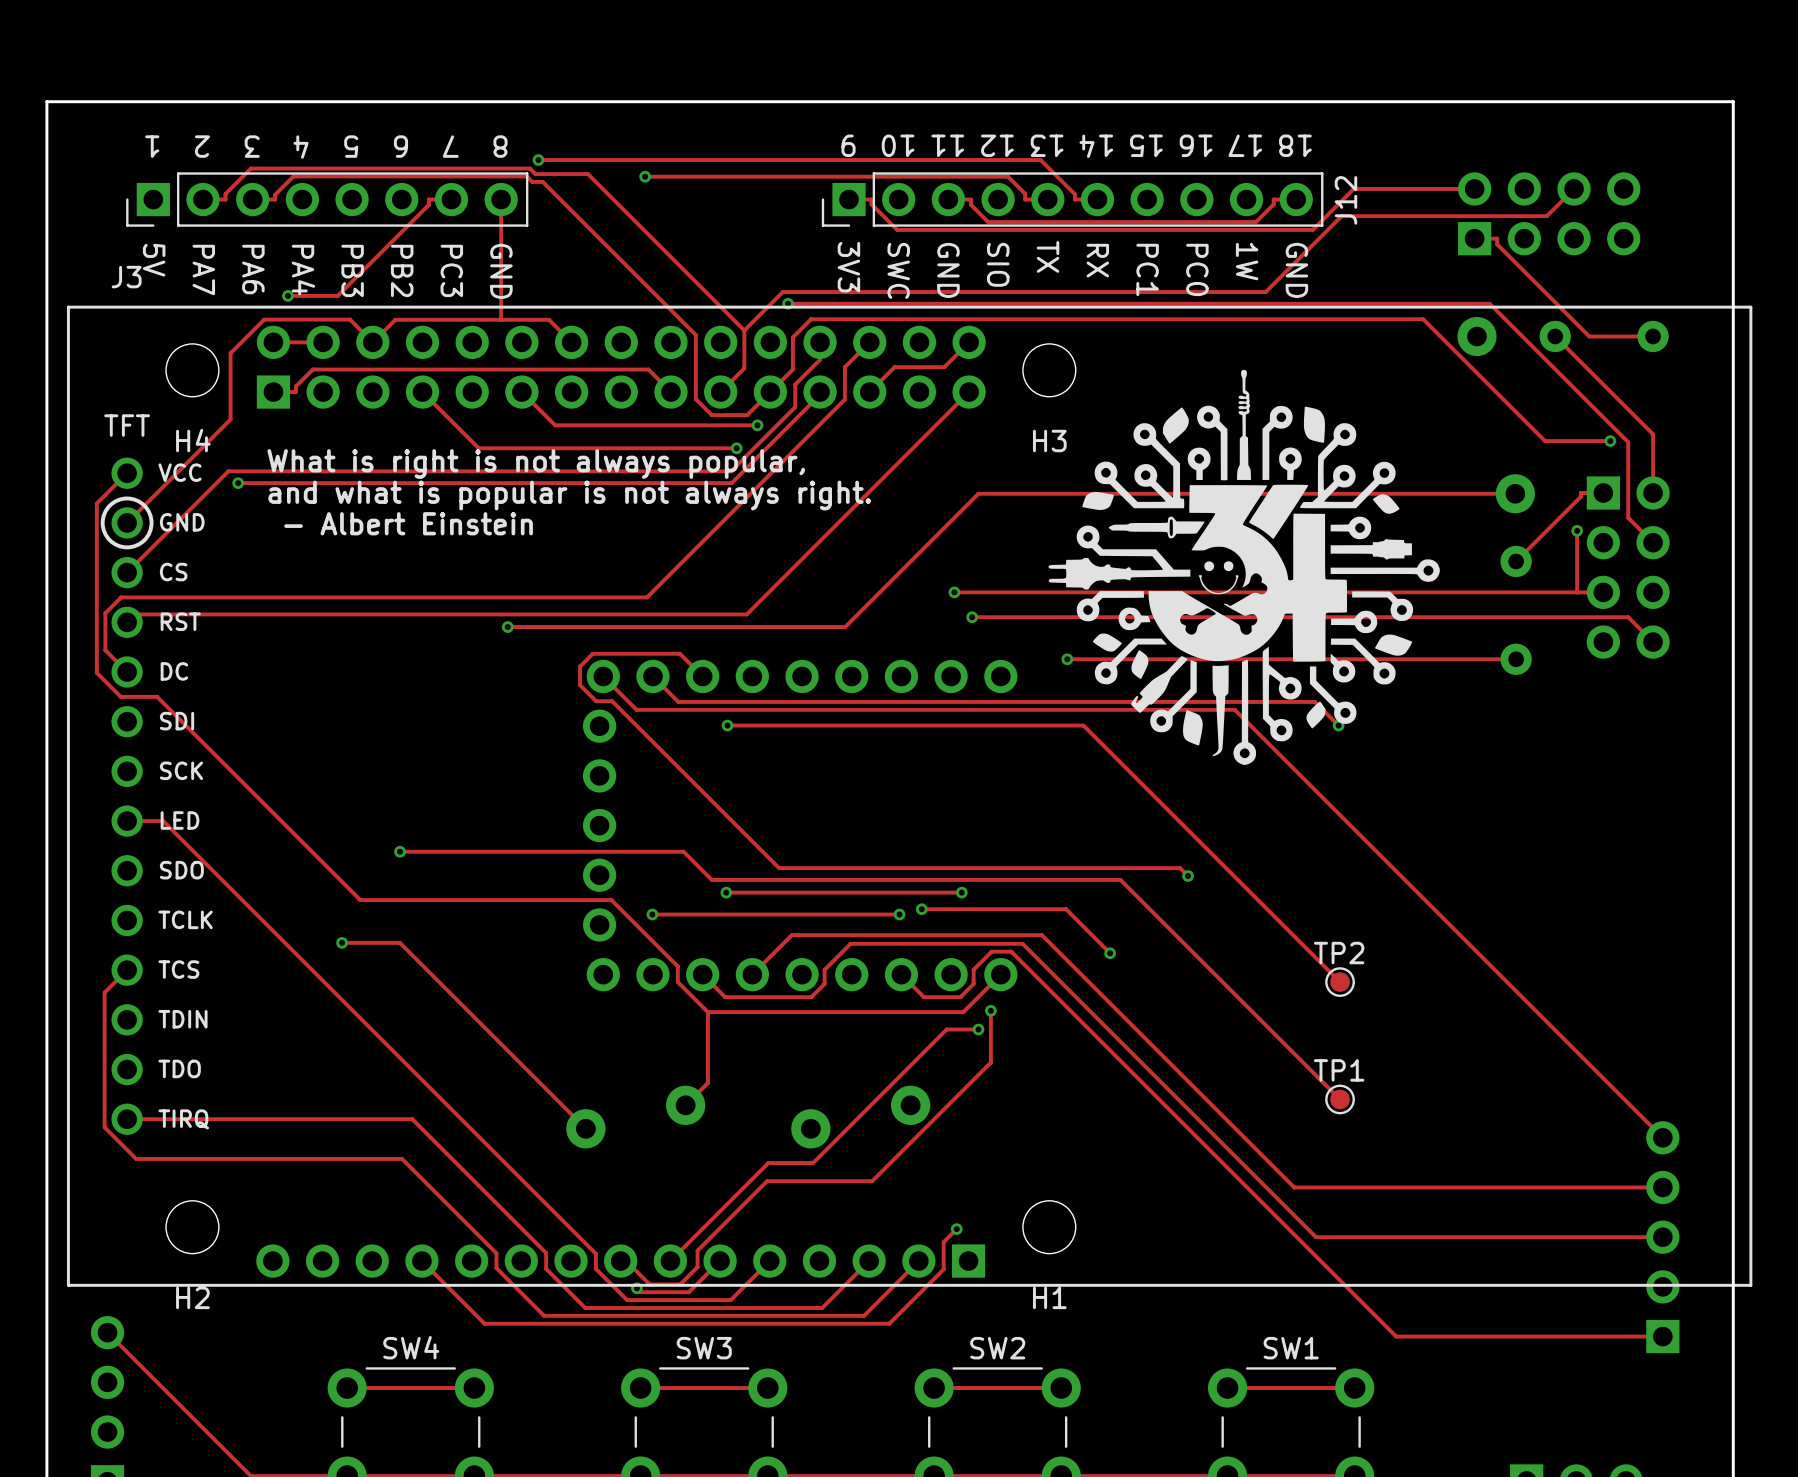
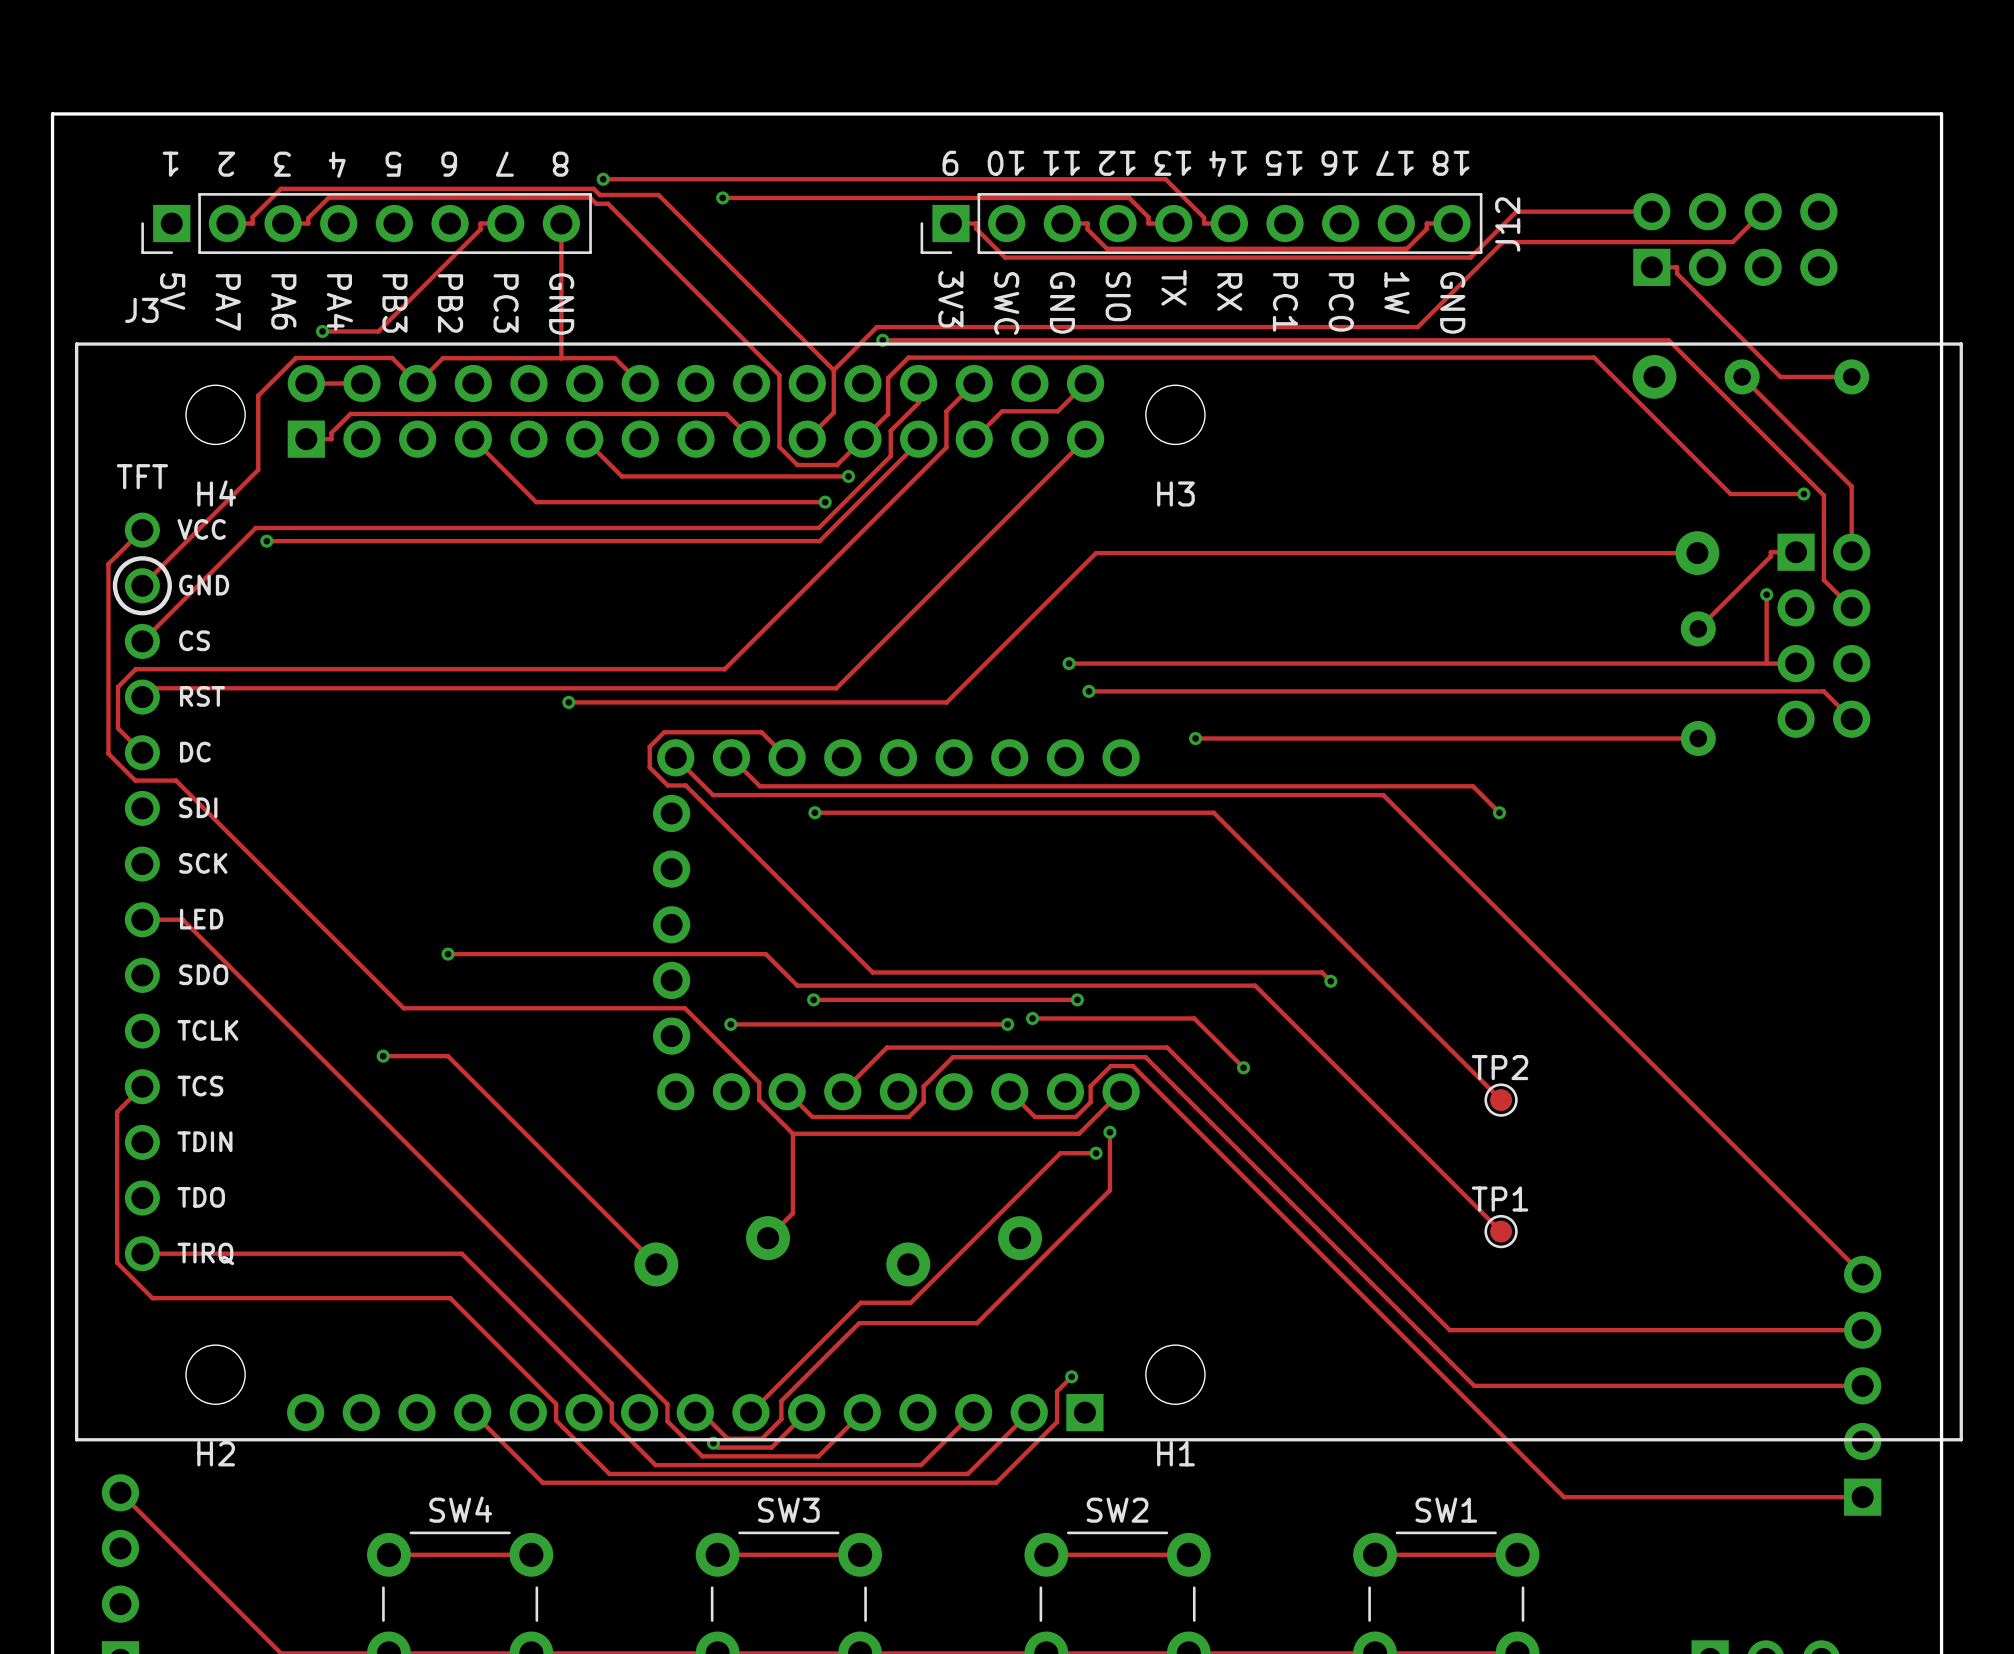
drawing: [1048, 369, 1440, 765] -> none
text: What is right is not always popular, (536, 464) -> none
text: and what is popular is not always right. (569, 495) -> none
text: - Albert Einstein (408, 523) -> none

